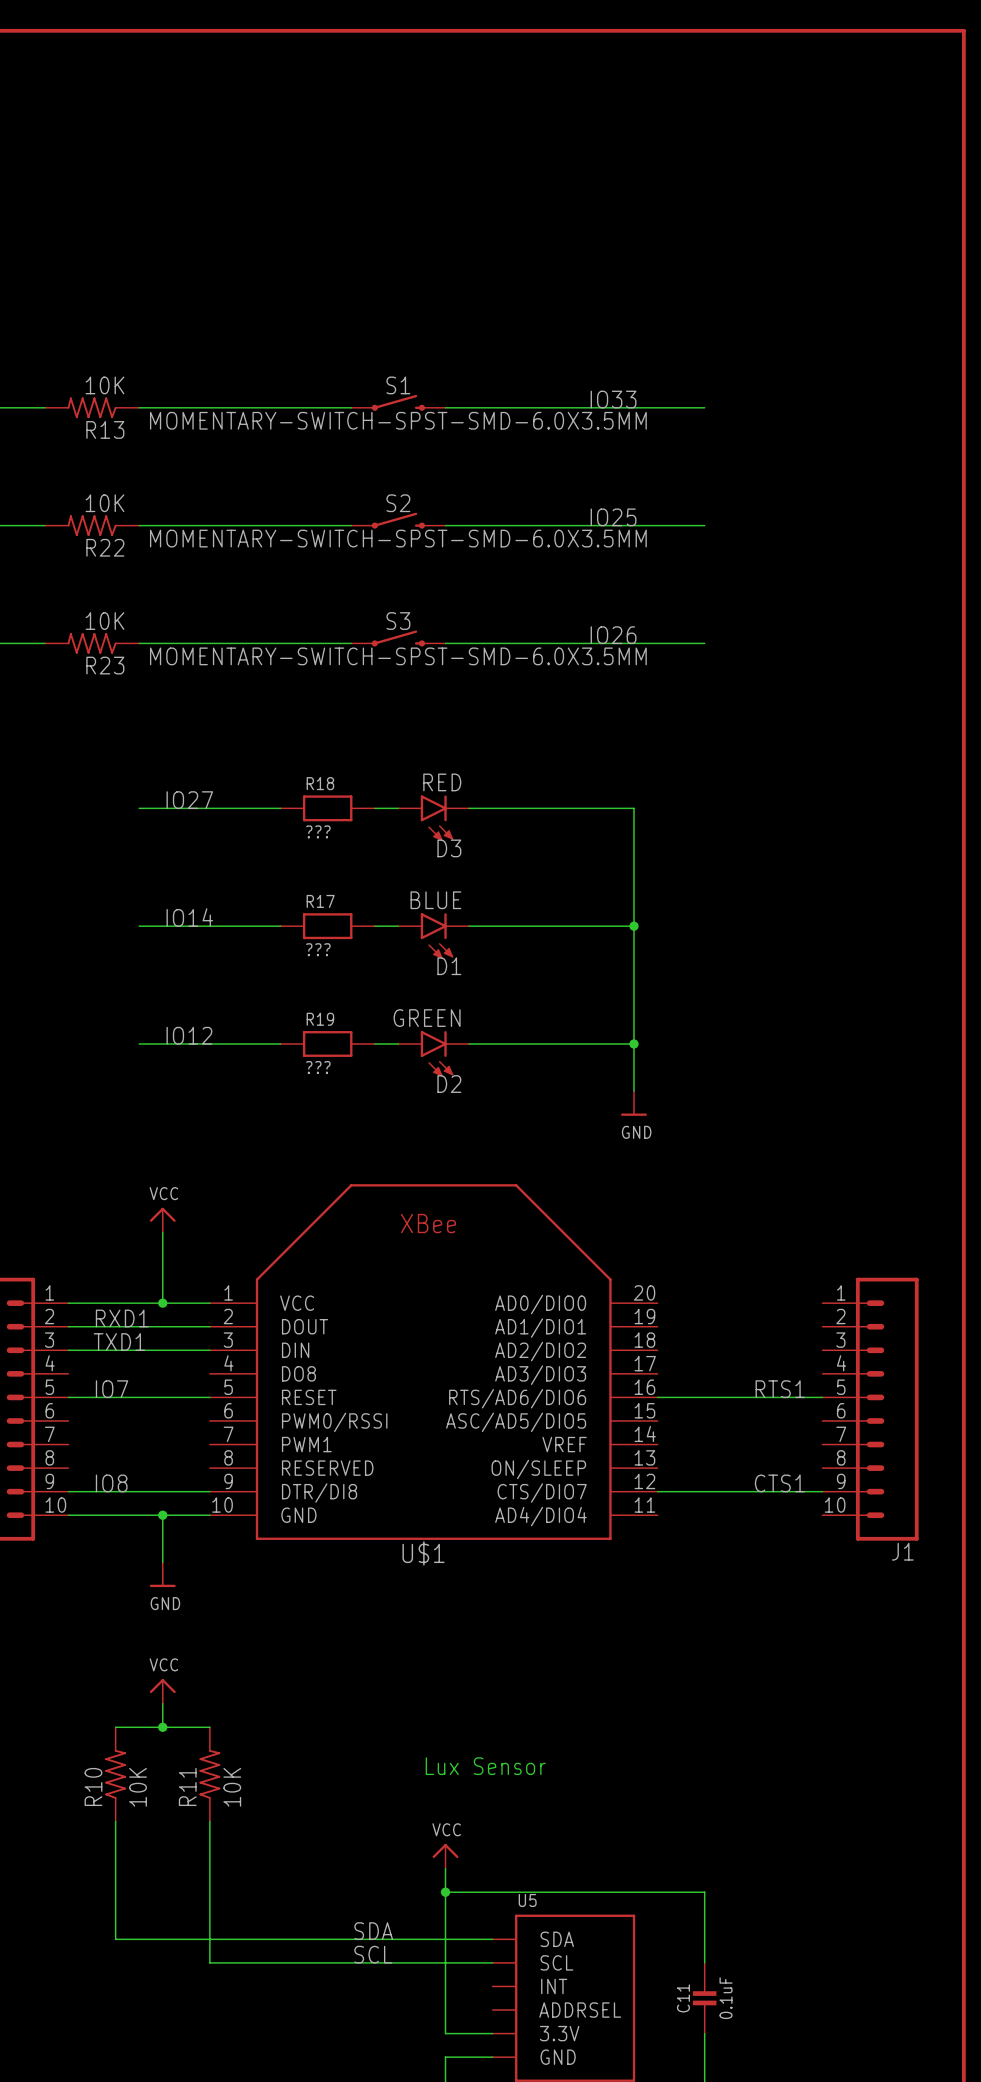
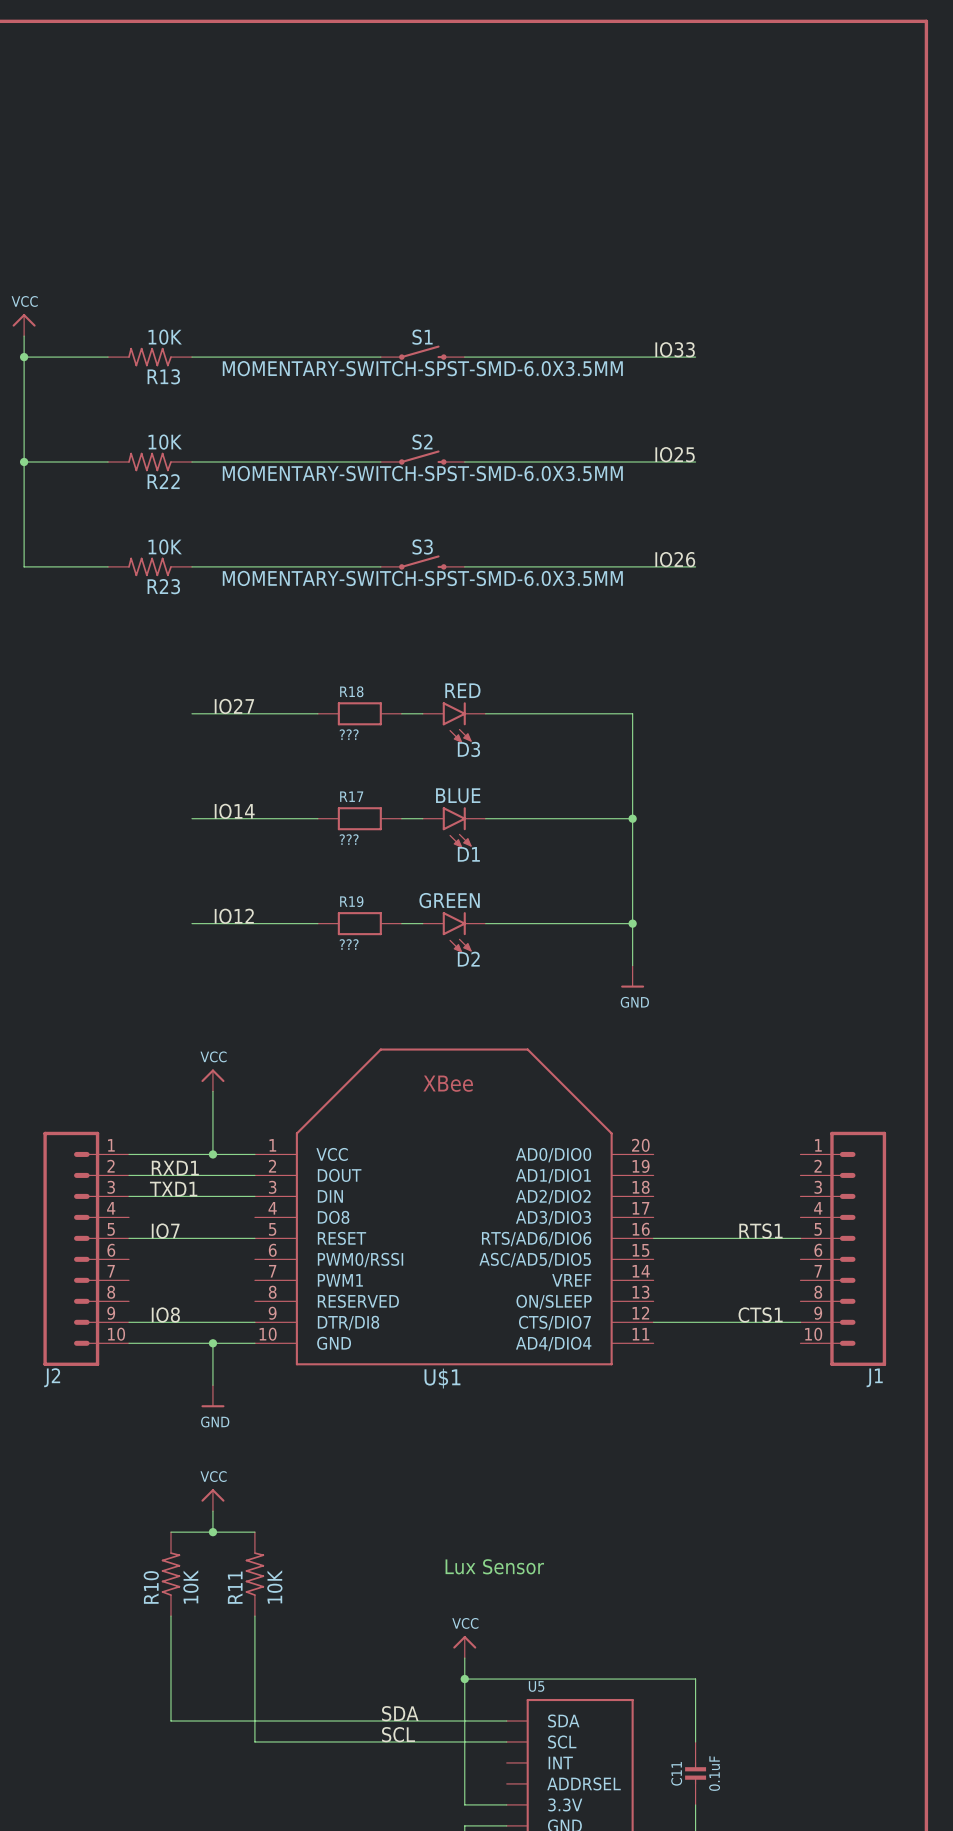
label position: IO33 (613, 399) -> IO33 (675, 349)
label position: IO25 (613, 517) -> IO25 (675, 454)
label position: IO26 (613, 635) -> IO26 (675, 559)

